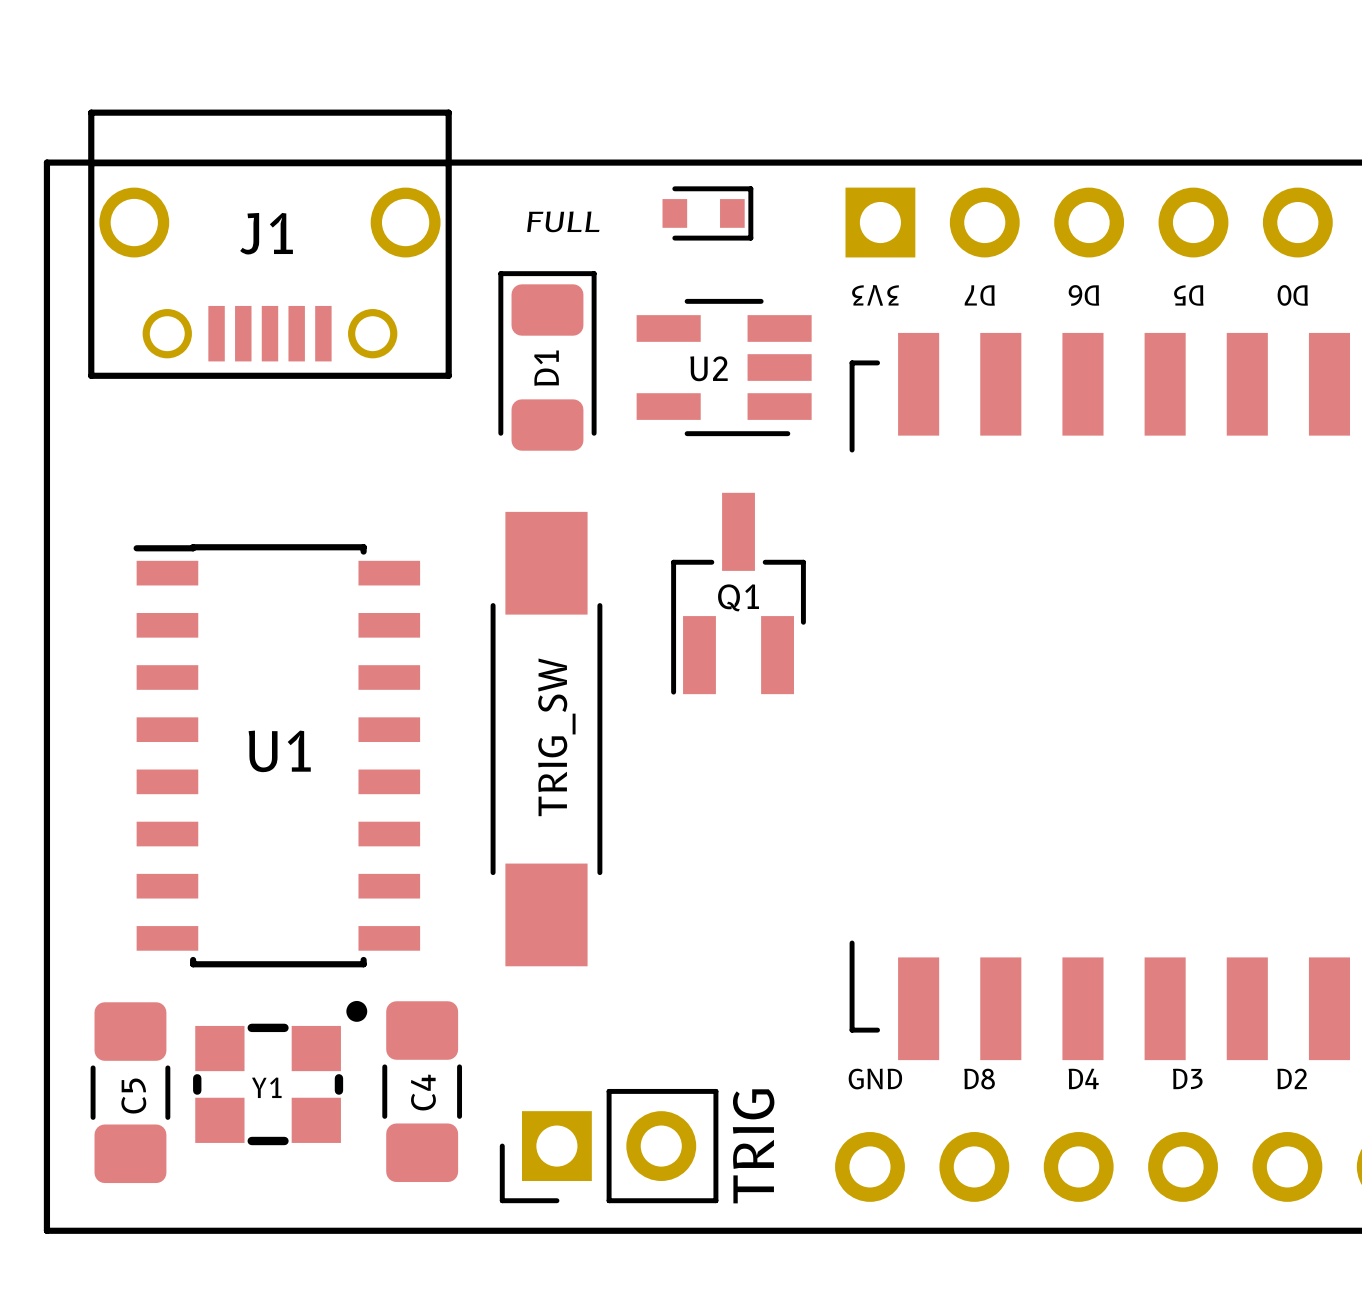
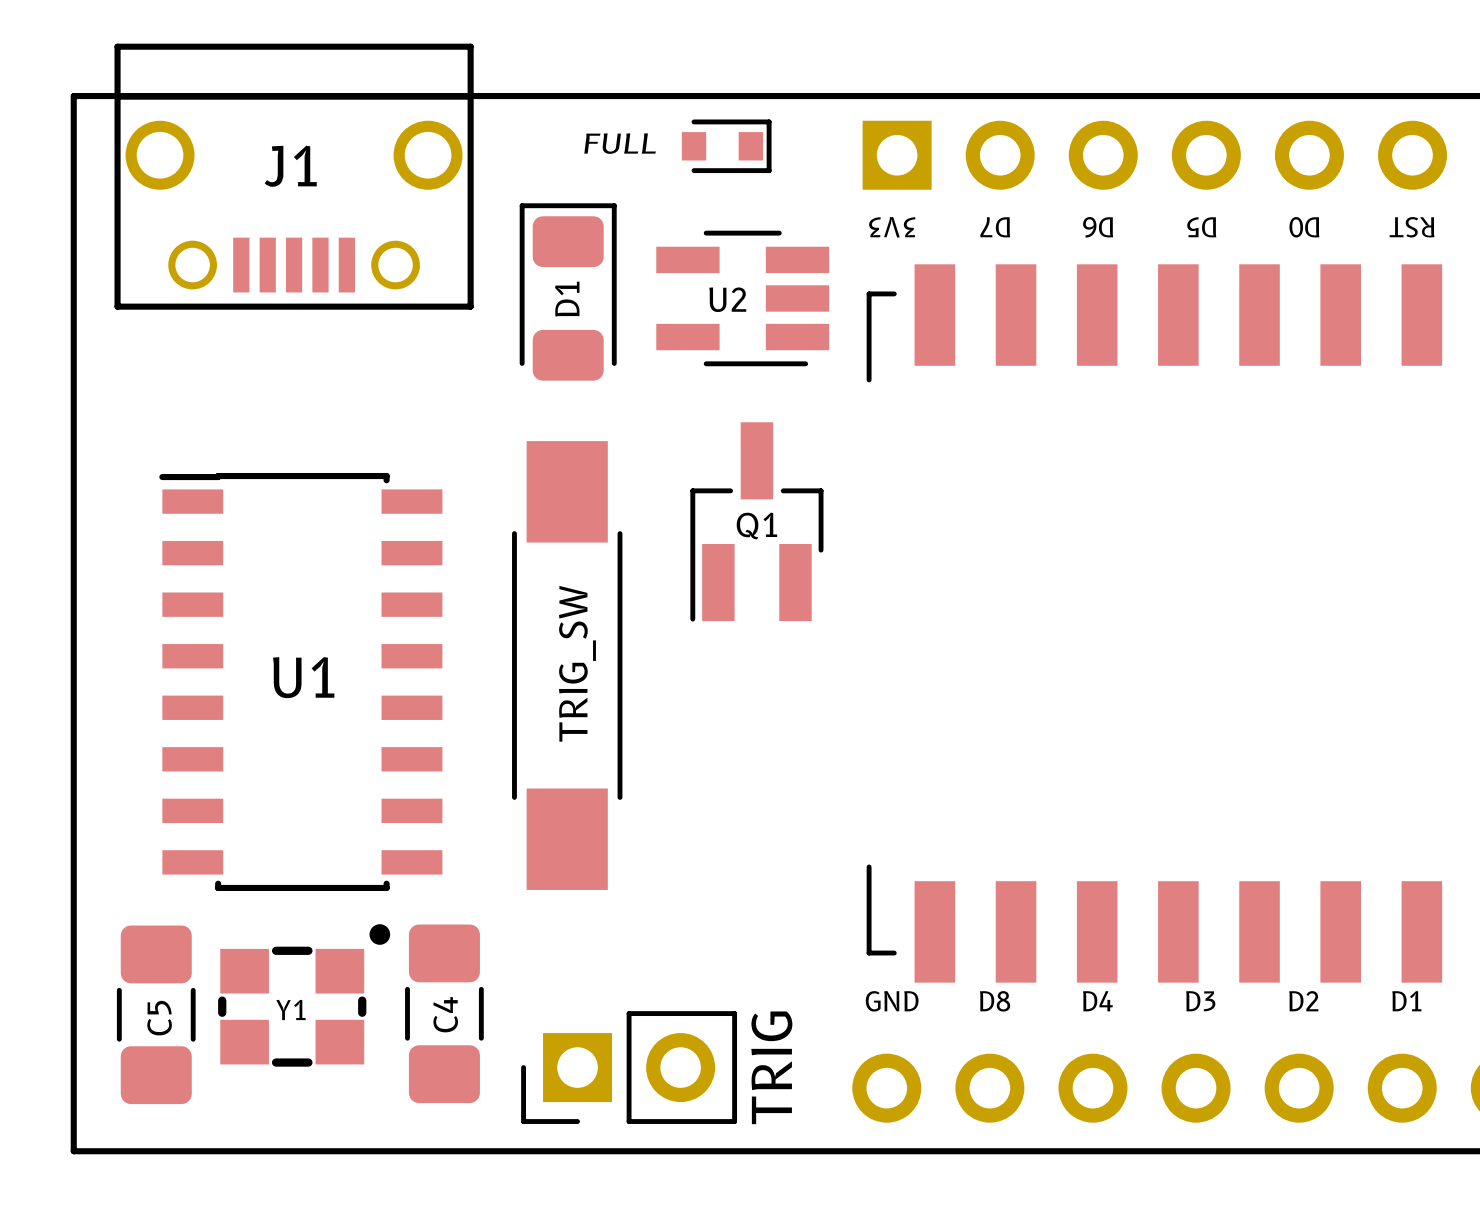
text position: FULL (563, 221) -> FULL (620, 143)

